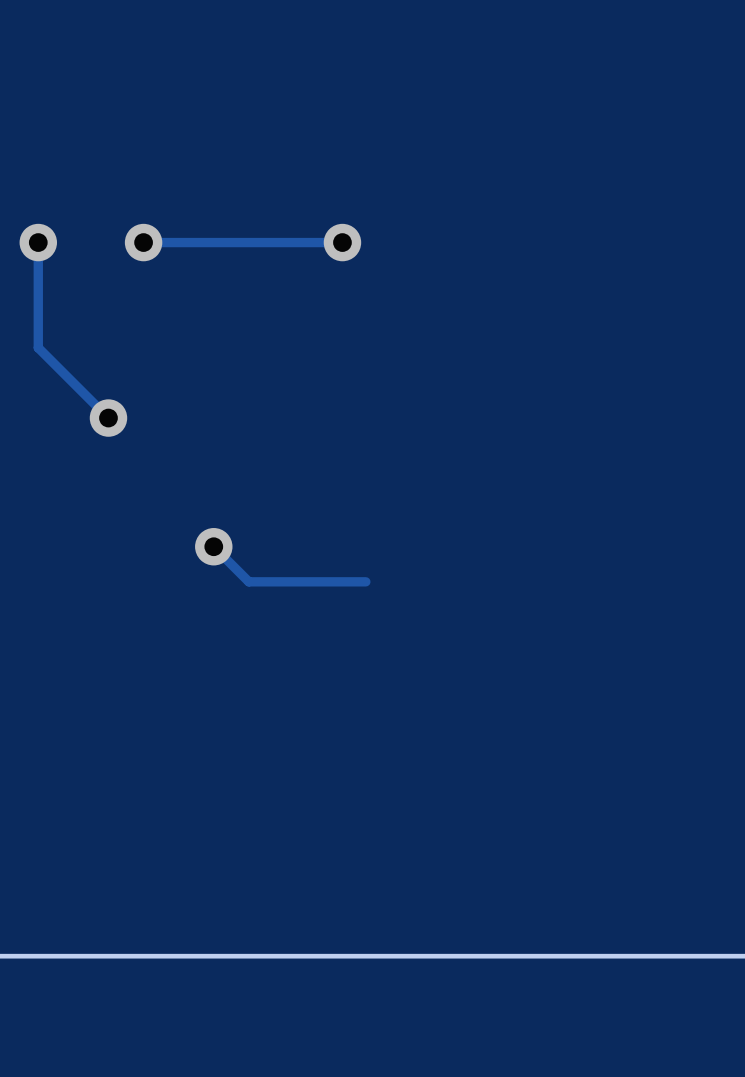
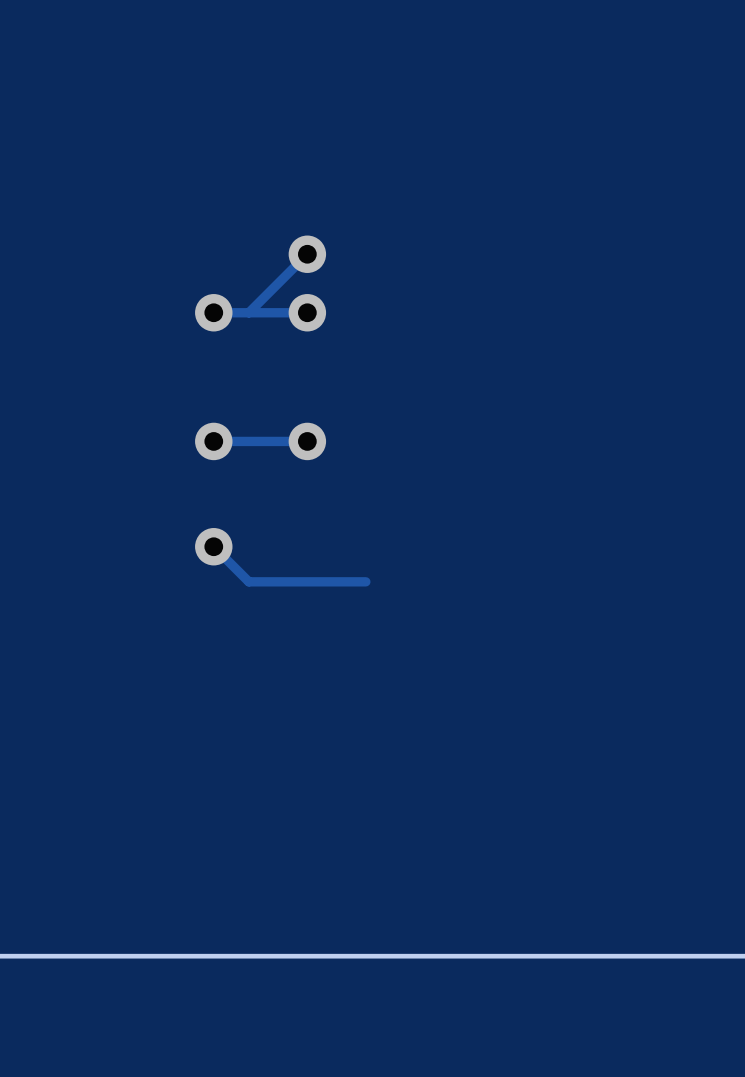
track: (38, 242) (38, 347) (108, 418) -> none
via: (38, 242) -> none
via: (143, 242) -> none
track: (342, 242) (143, 242) -> none
via position: (342, 242) -> (307, 254)
track: none -> (307, 254) (248, 312)
via: none -> (213, 312)
track: none -> (307, 312) (213, 312)
via: none -> (307, 312)
via: (108, 418) -> none
via: none -> (213, 441)
track: none -> (307, 441) (213, 441)
via: none -> (307, 441)

